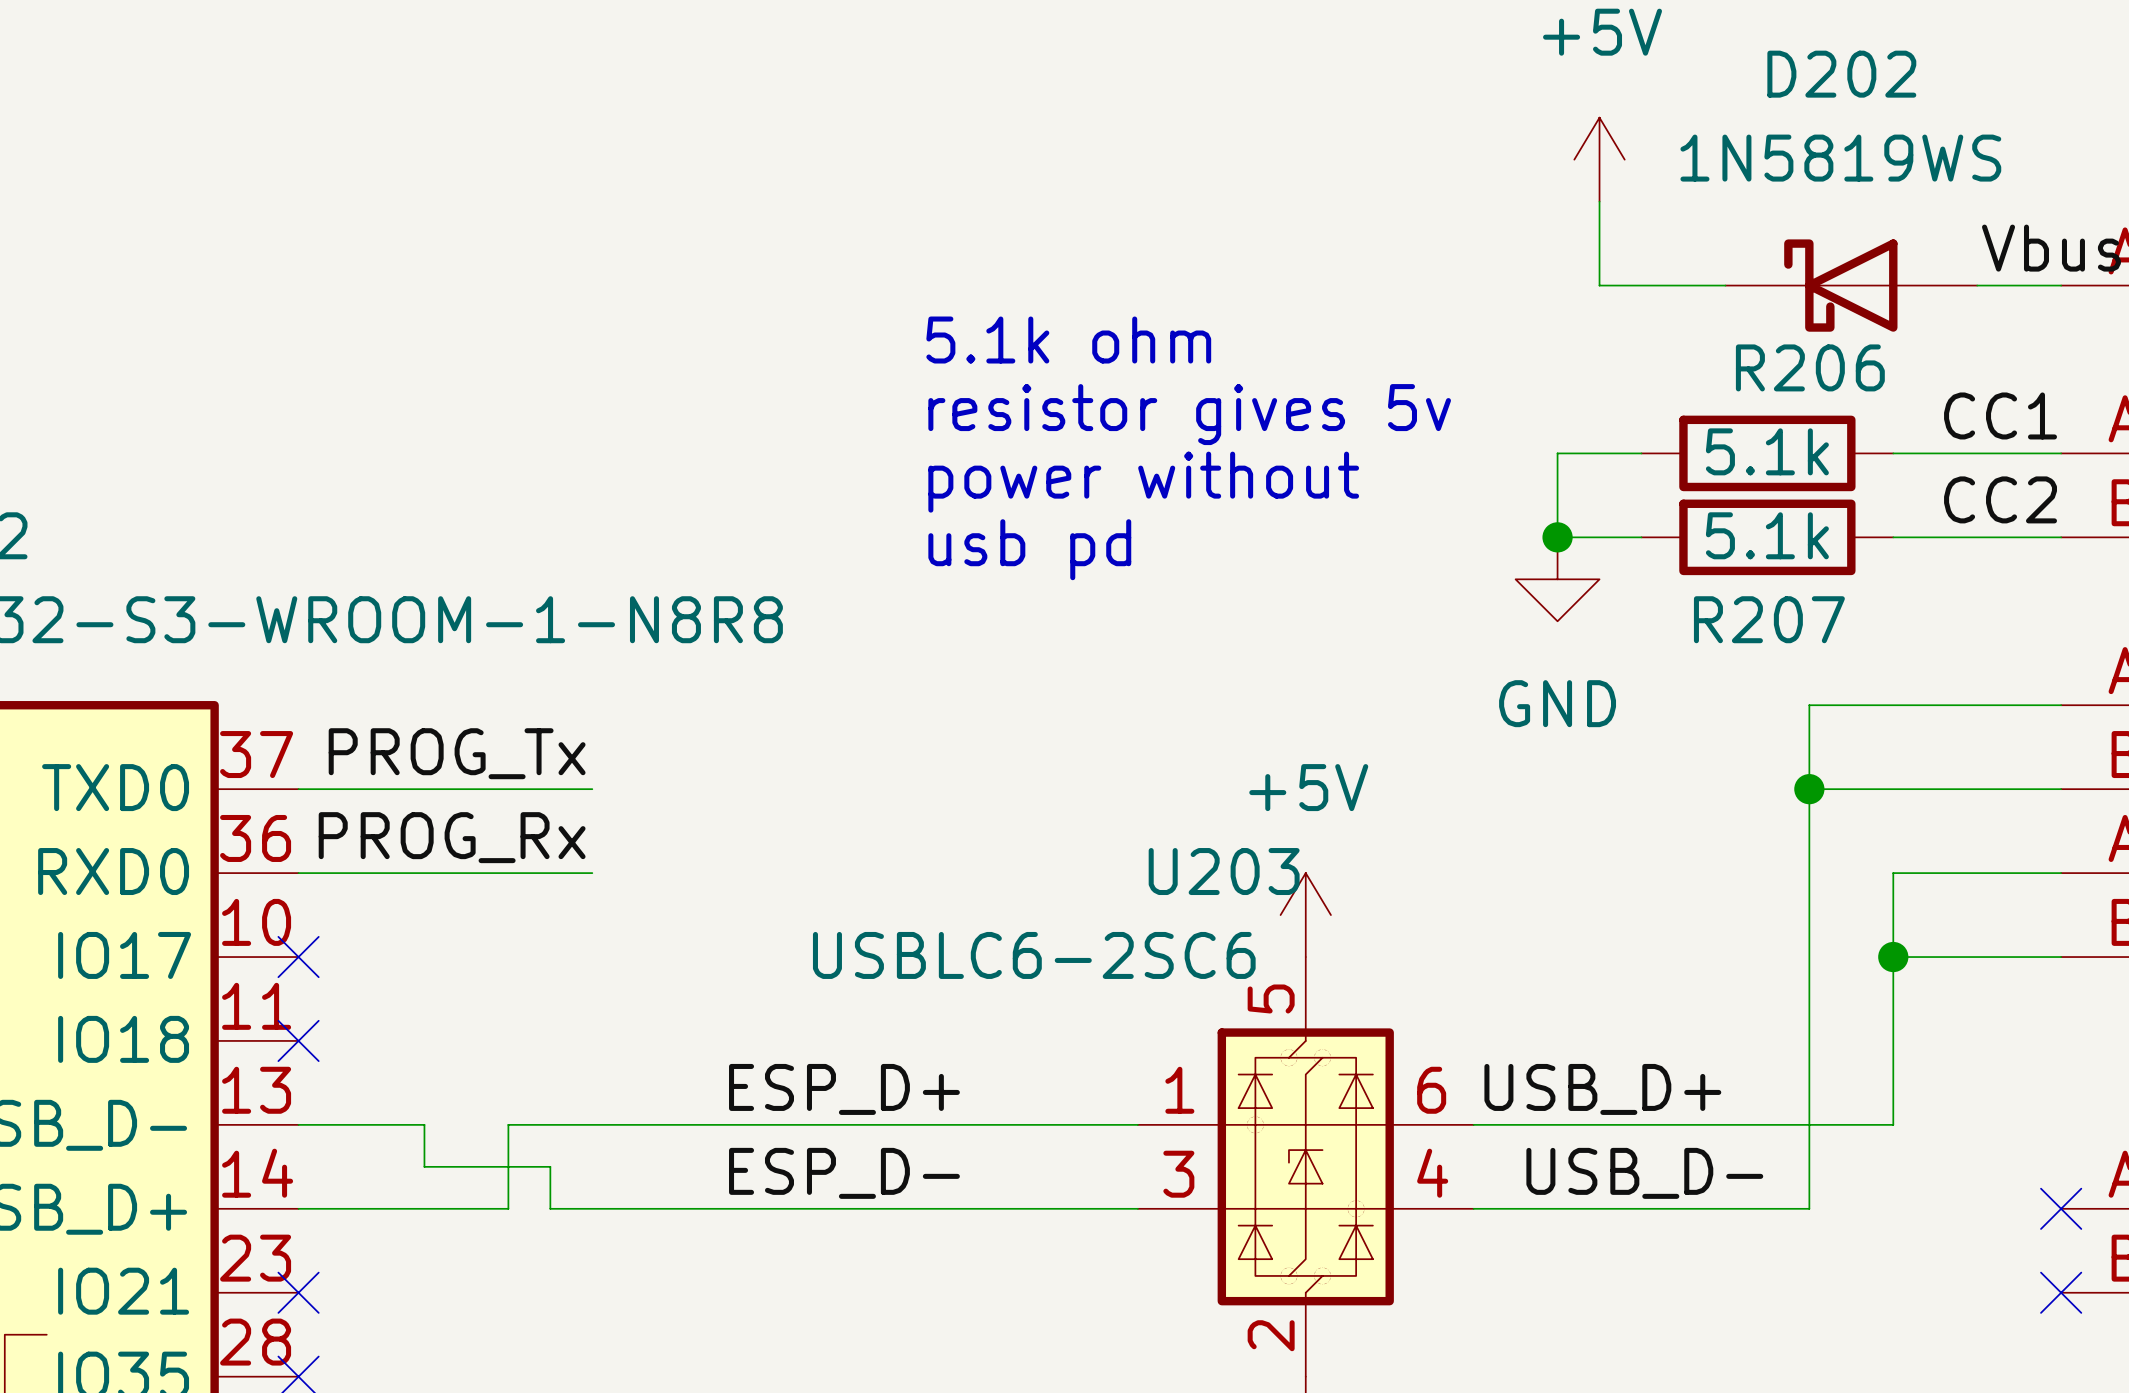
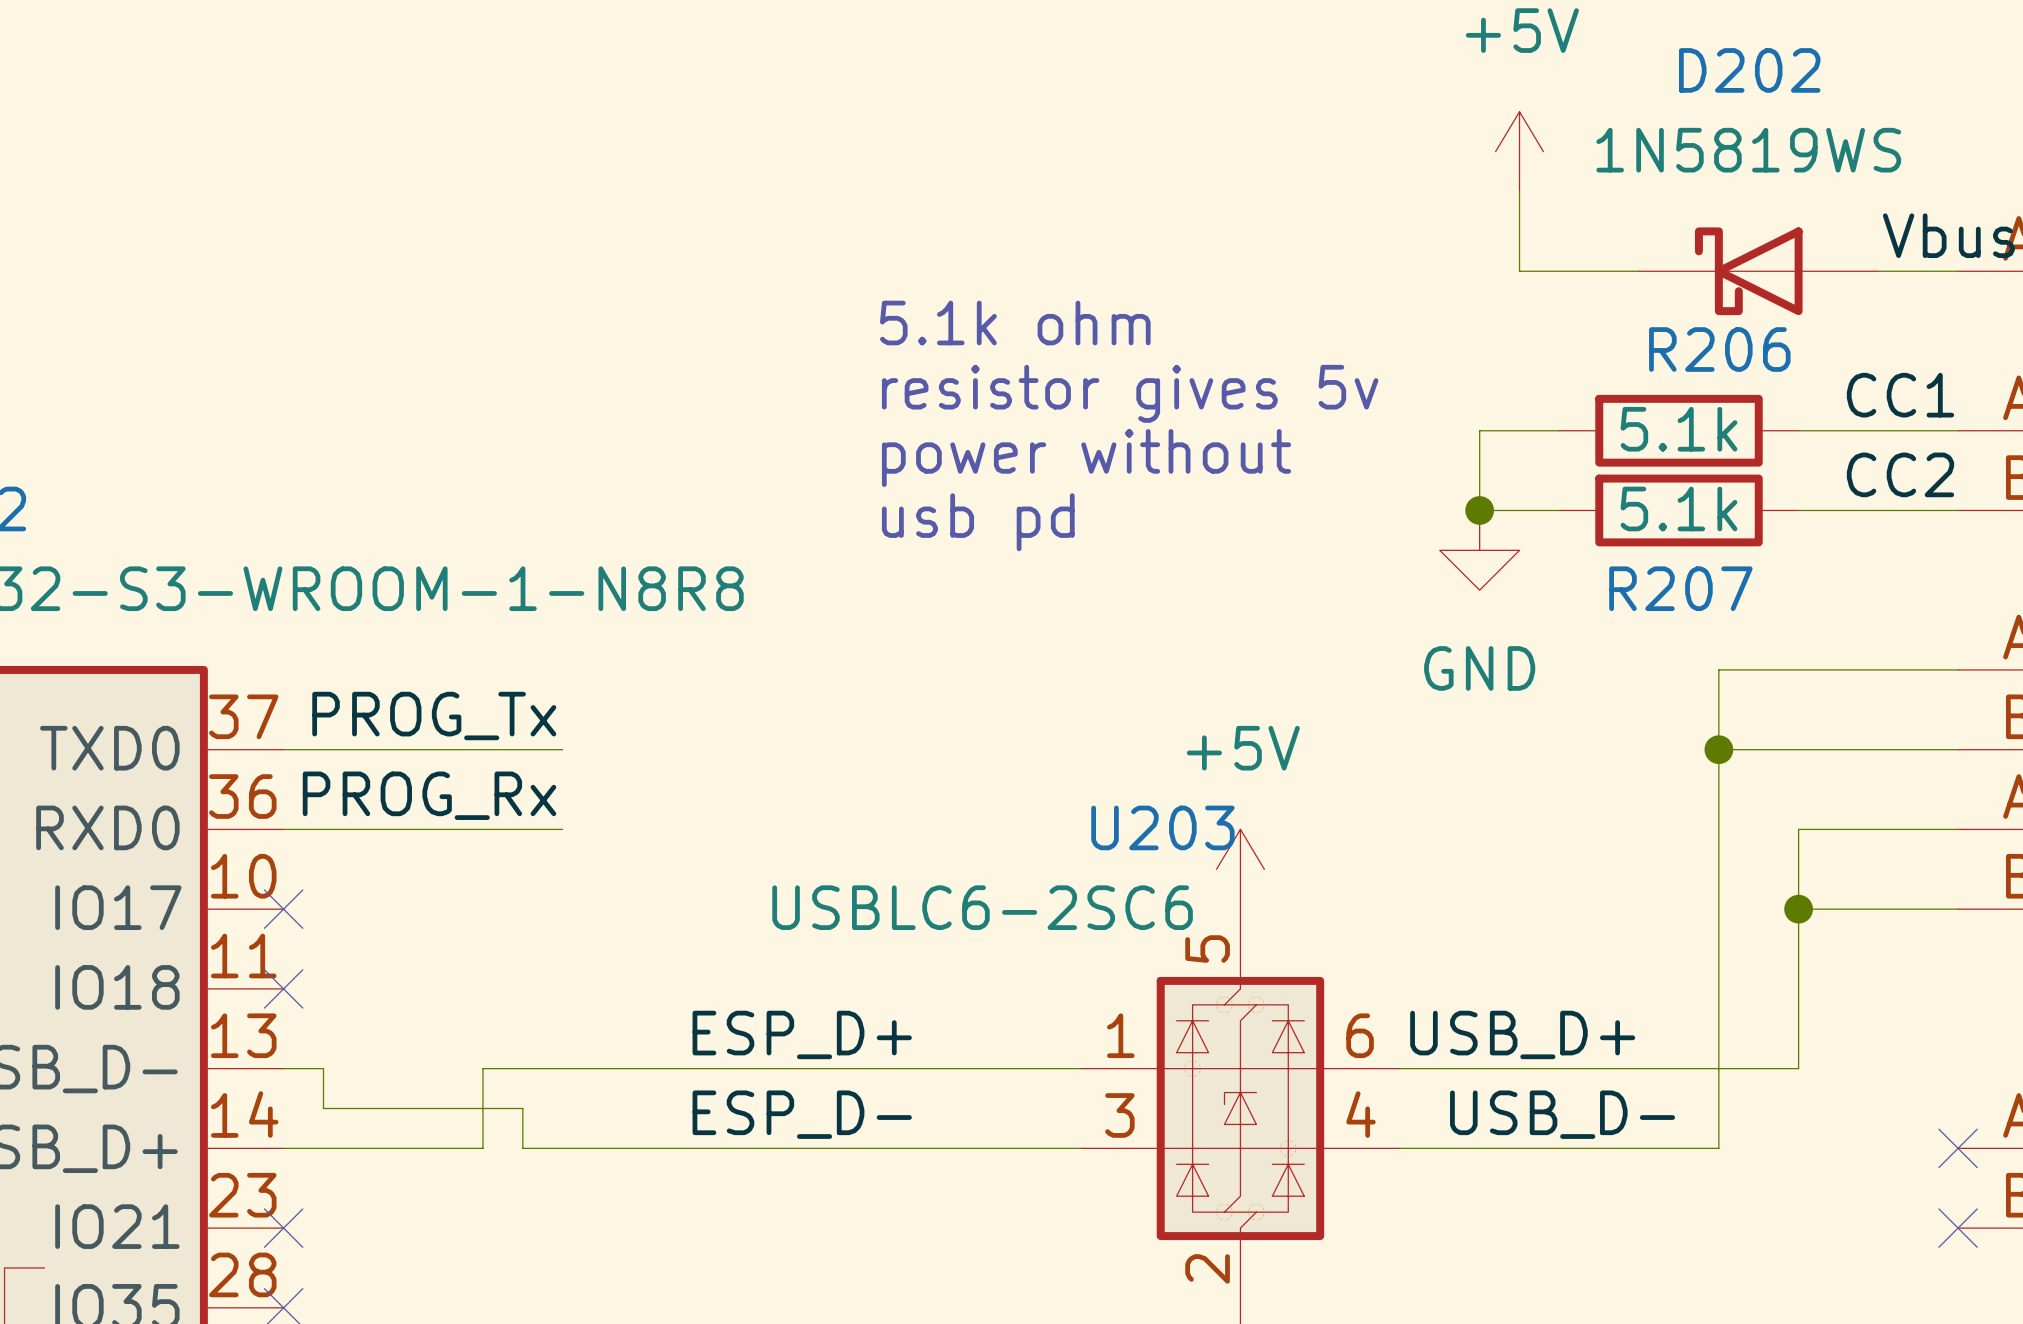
wire: (340, 1124) (424, 1124) (424, 1166) -> (323, 1068) (323, 1108) (403, 1108)

